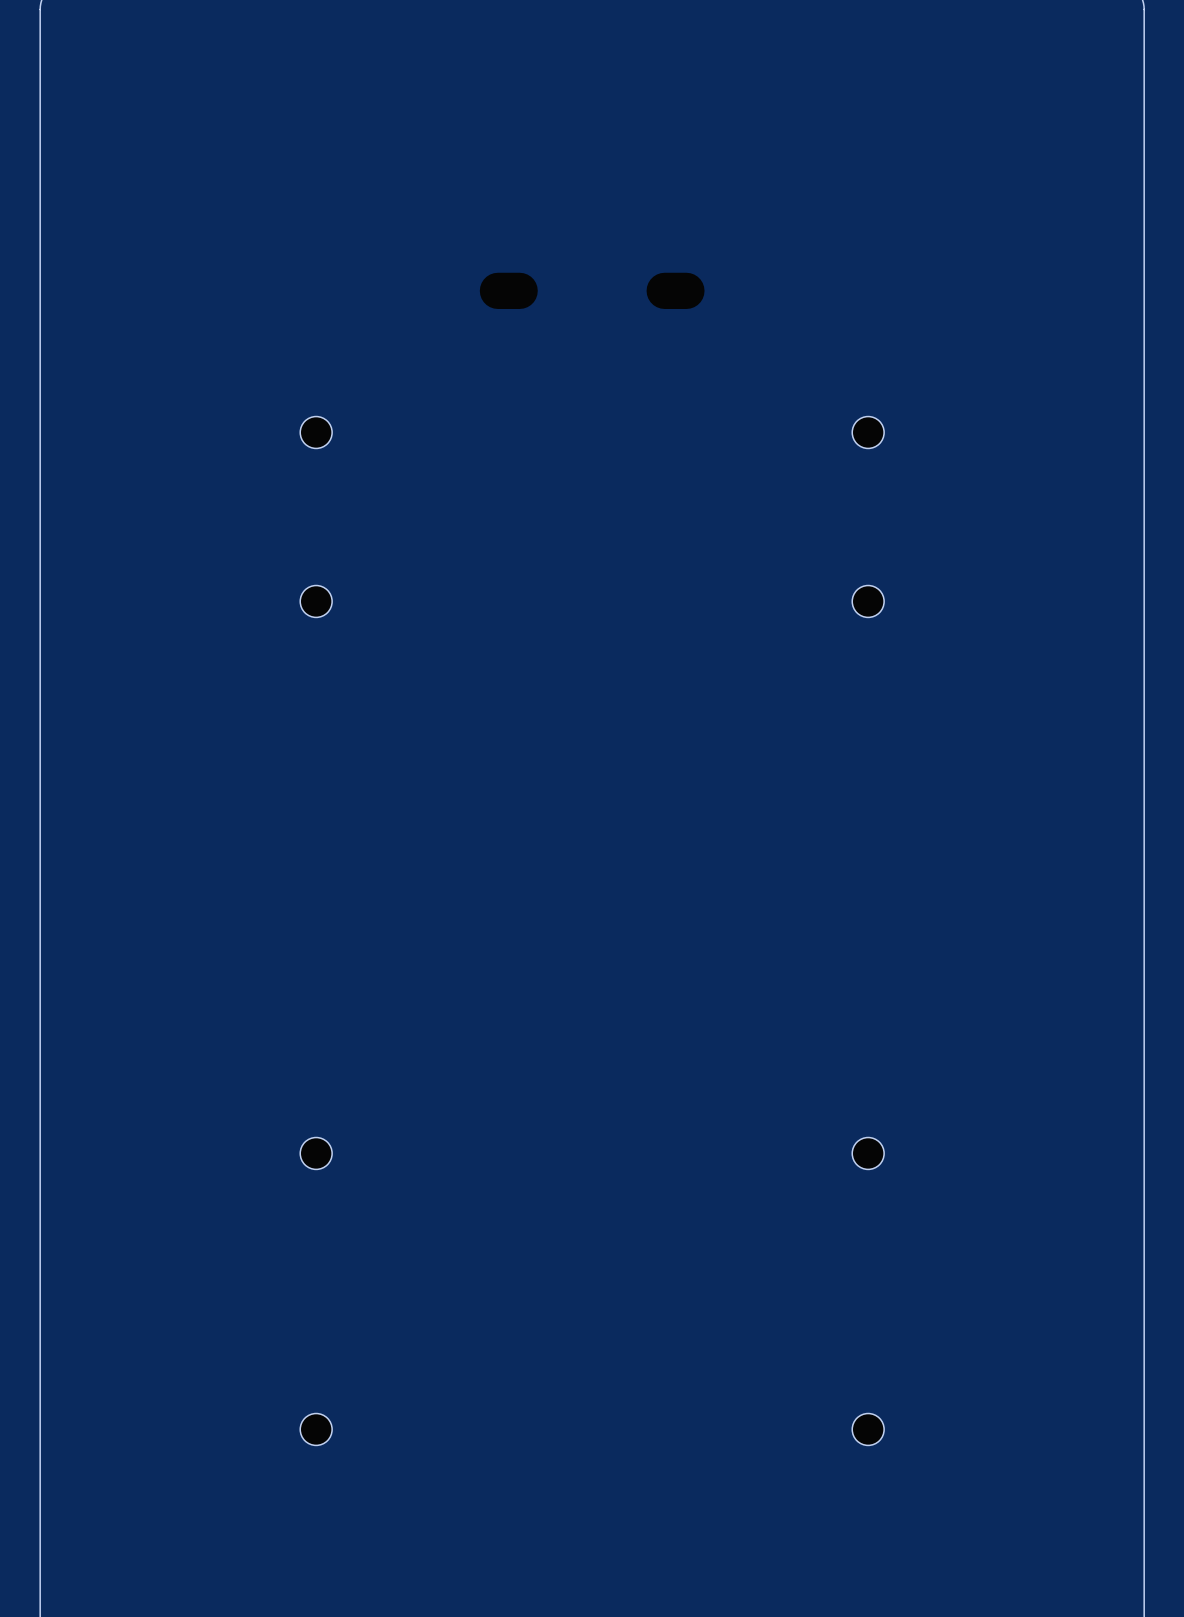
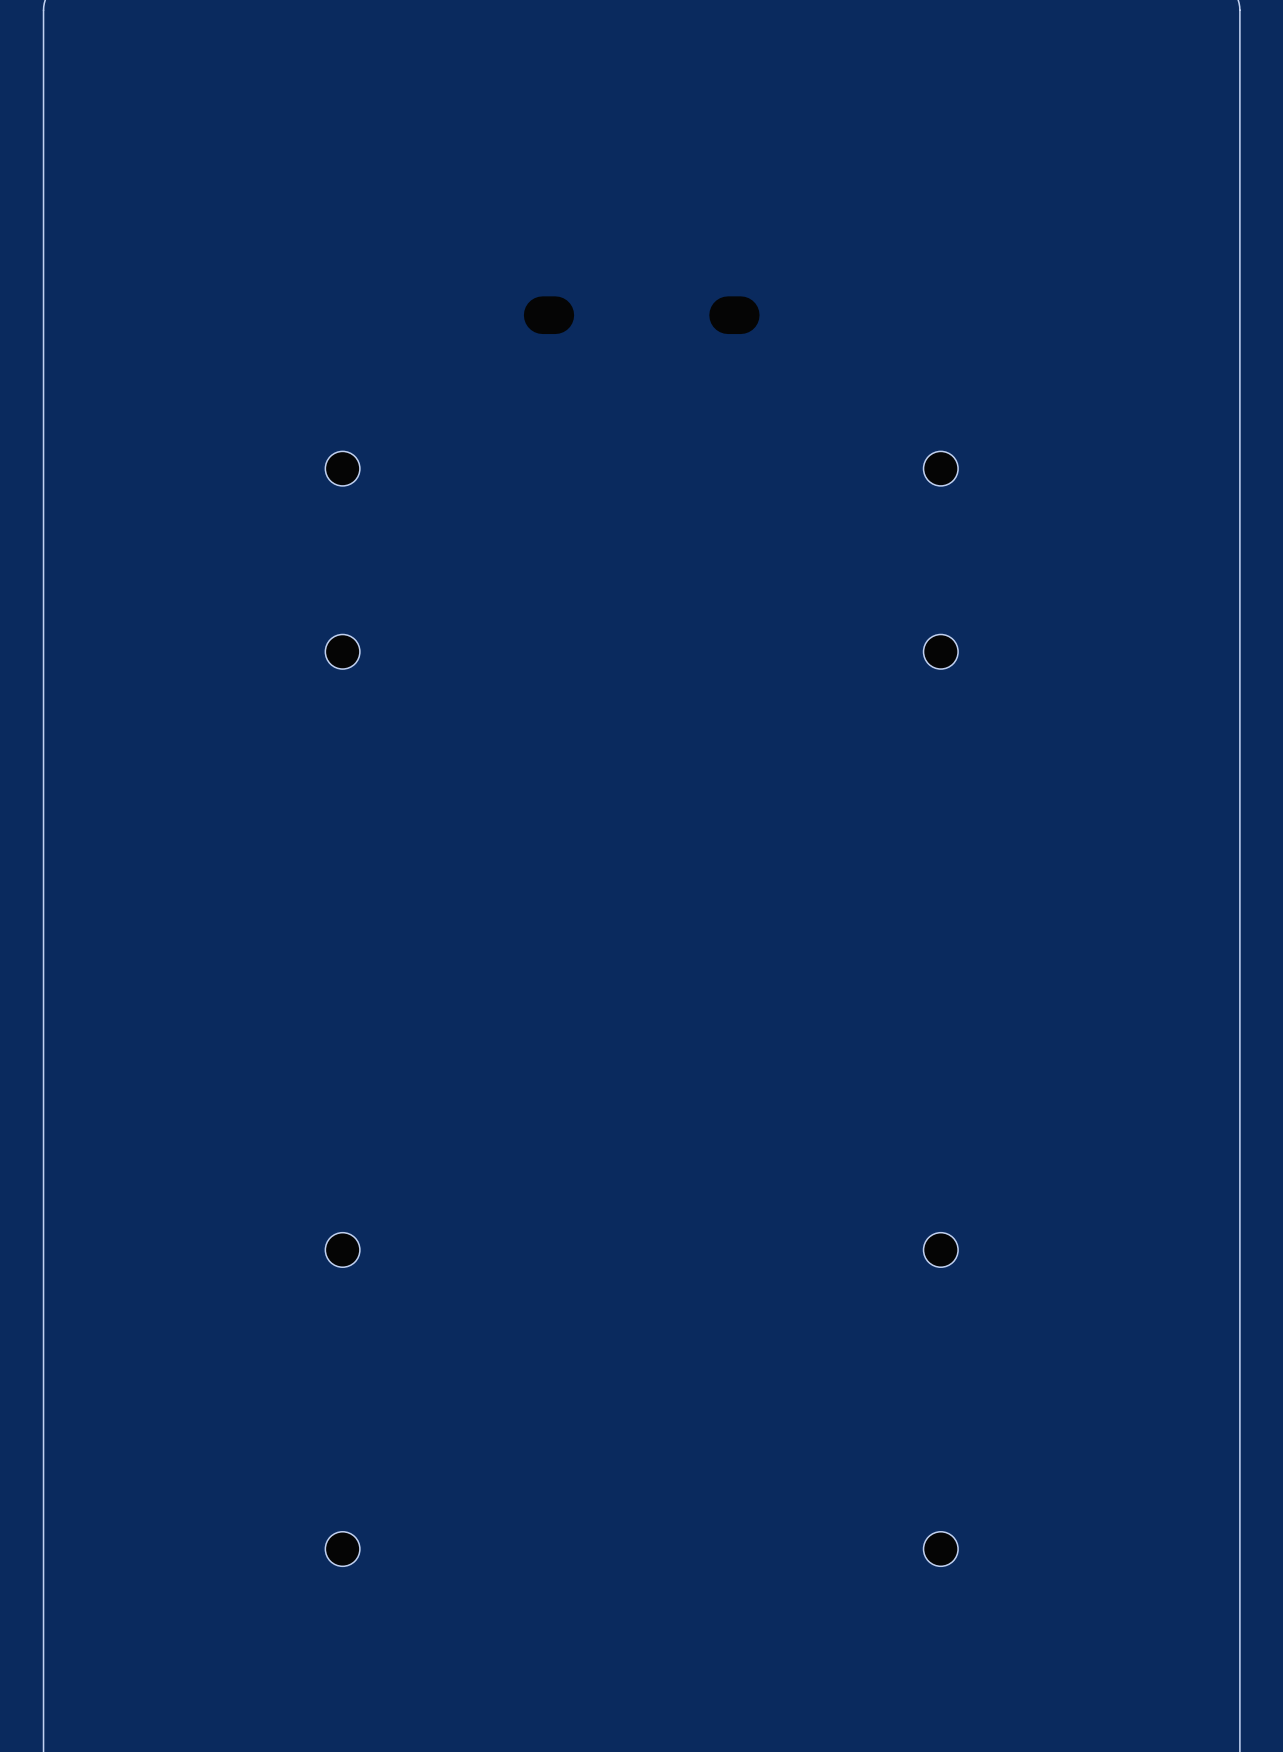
part footprint: [479, 272, 538, 309] -> [523, 296, 575, 335]
part footprint: [646, 272, 705, 309] -> [709, 296, 760, 335]

